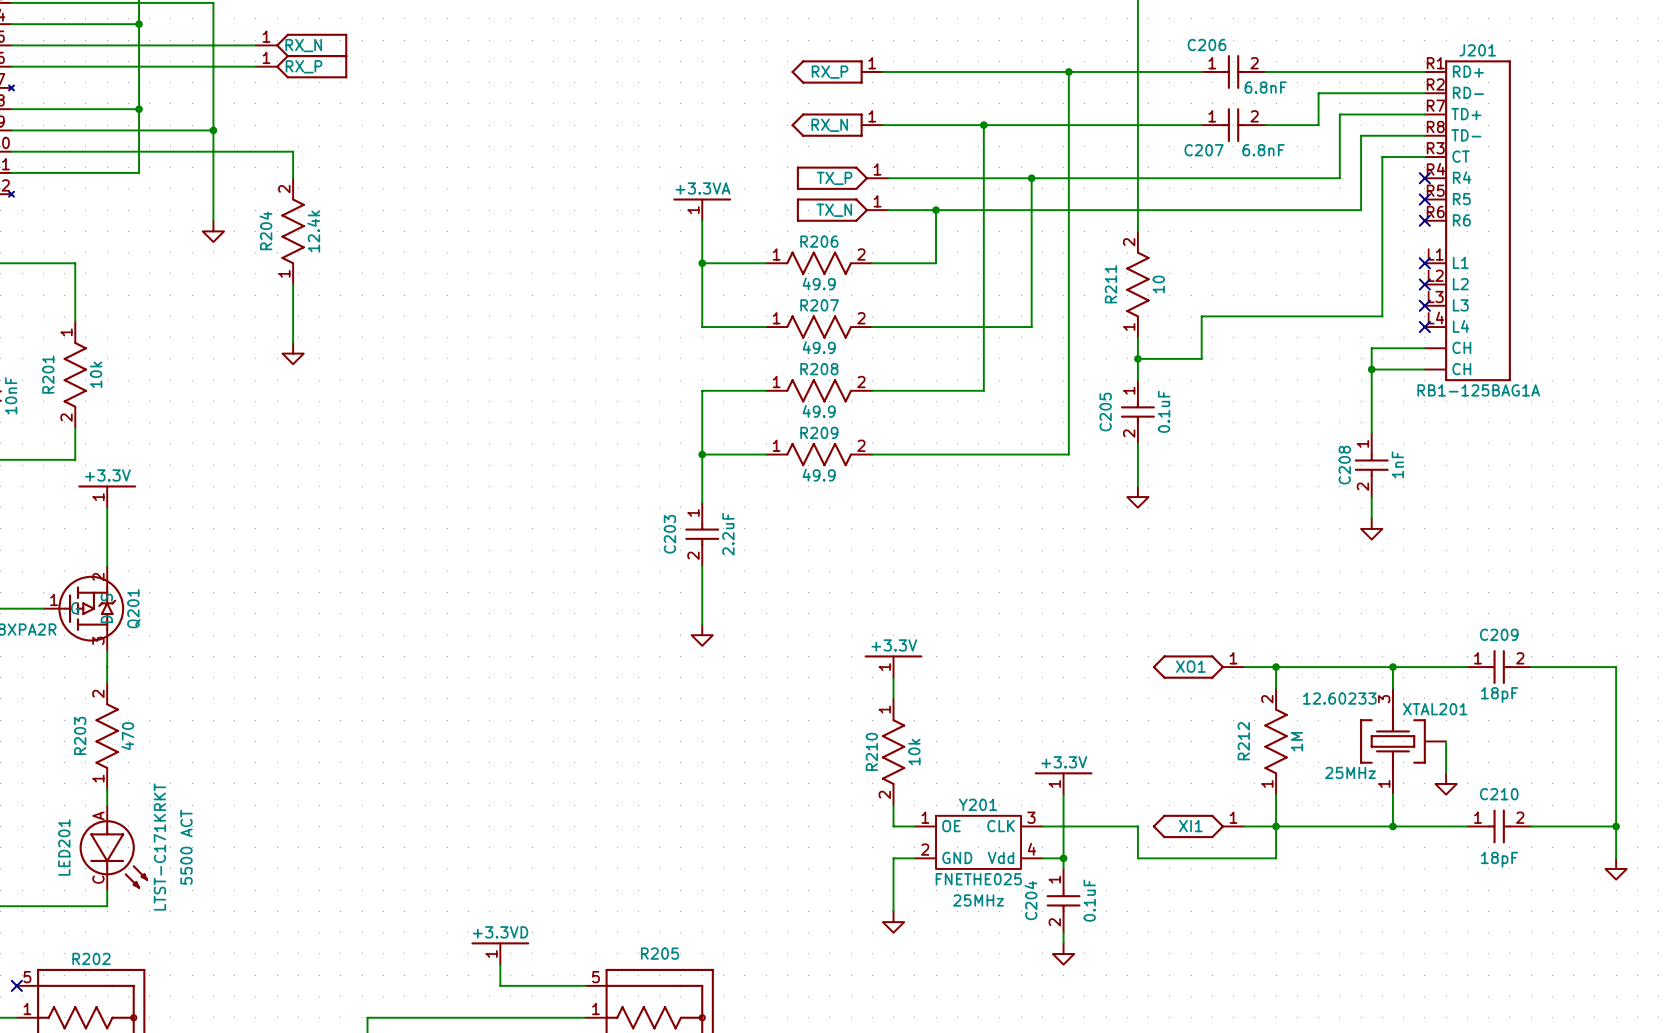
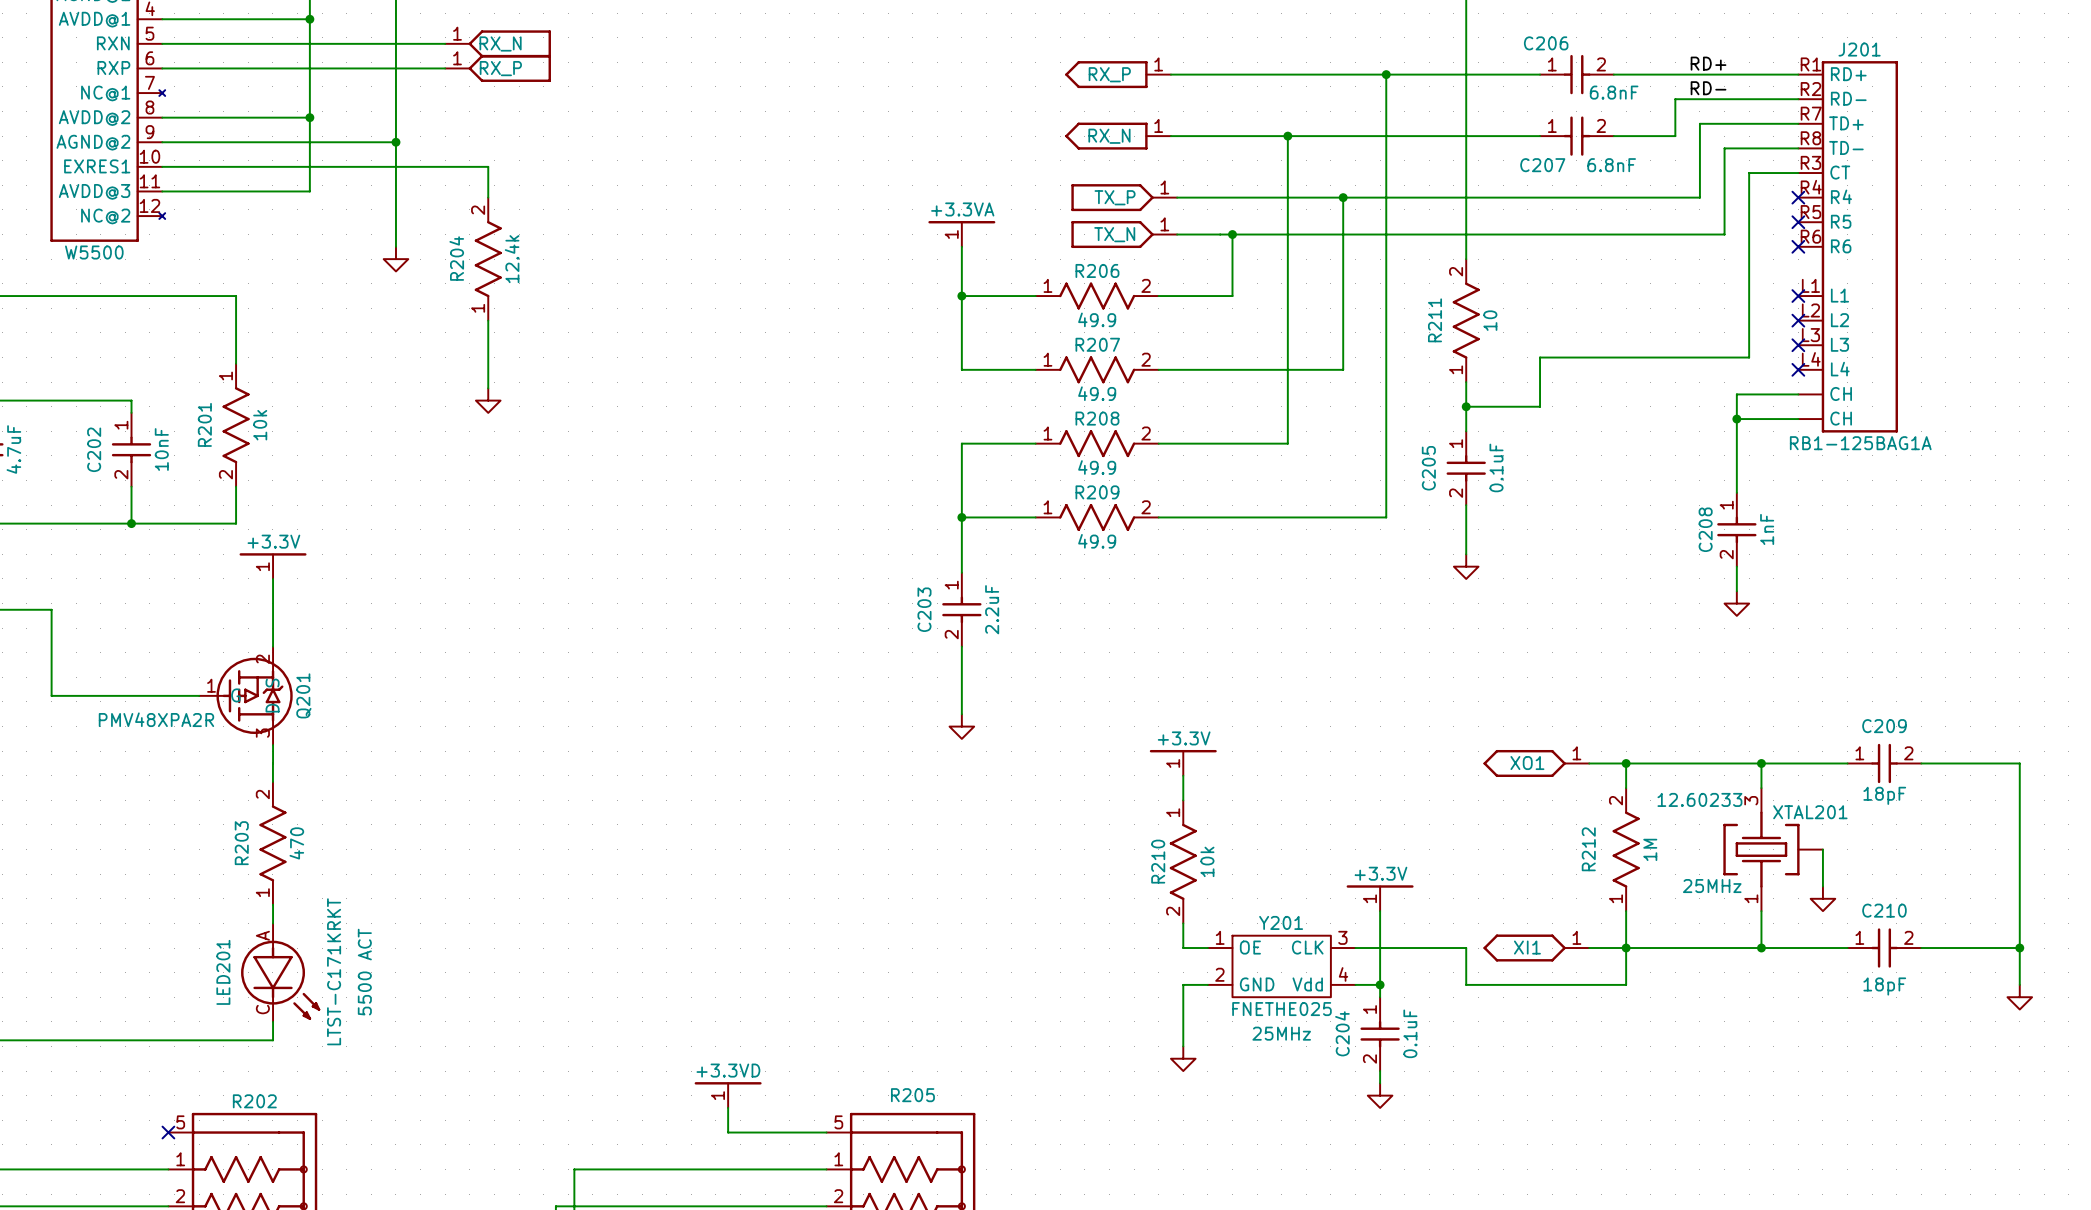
label: none -> RD+ (1708, 63)
label: none -> RD- (1708, 88)

